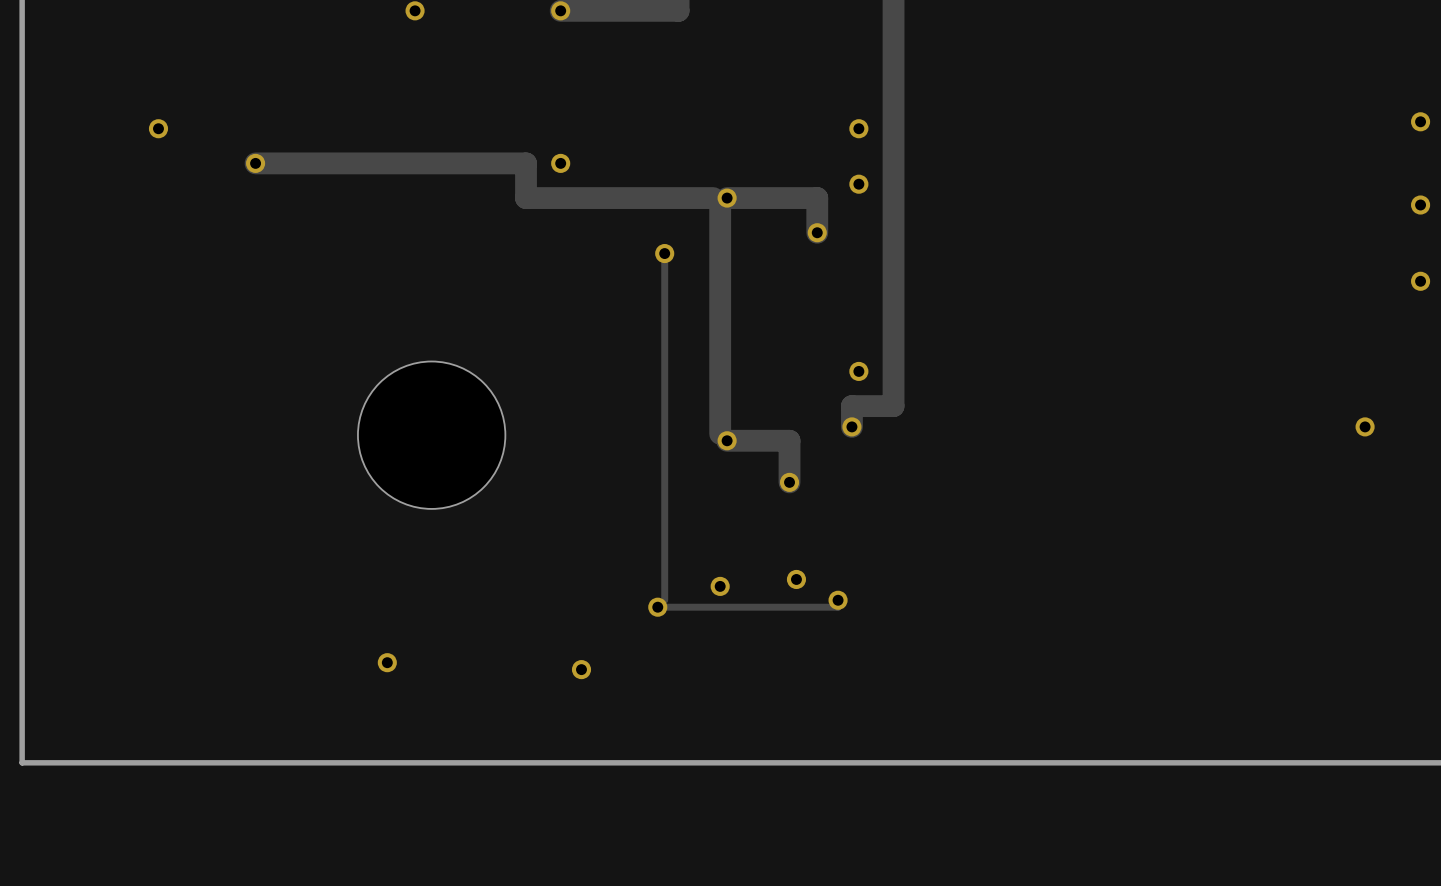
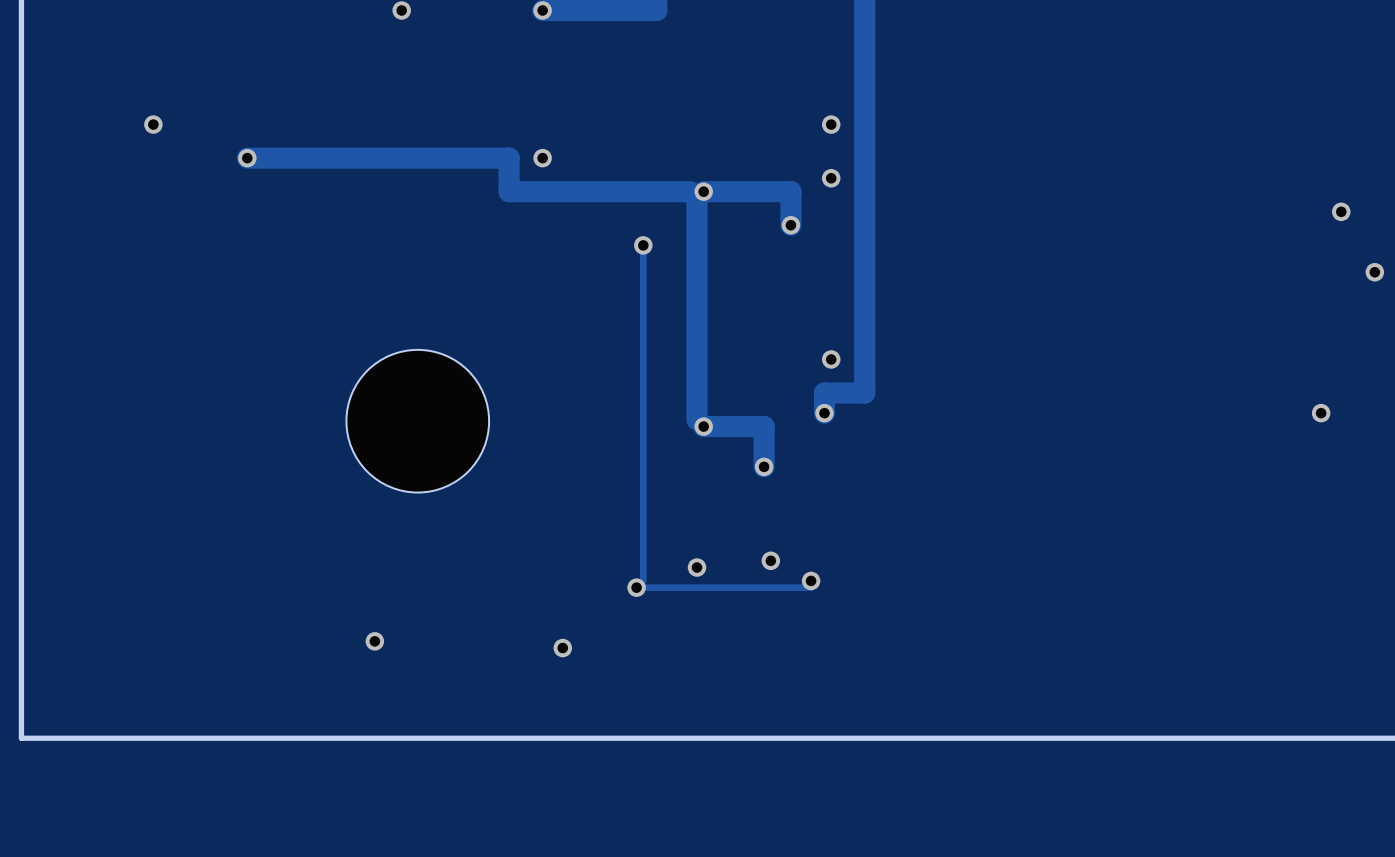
via: (1420, 121) -> none
via position: (1420, 205) -> (1341, 211)

